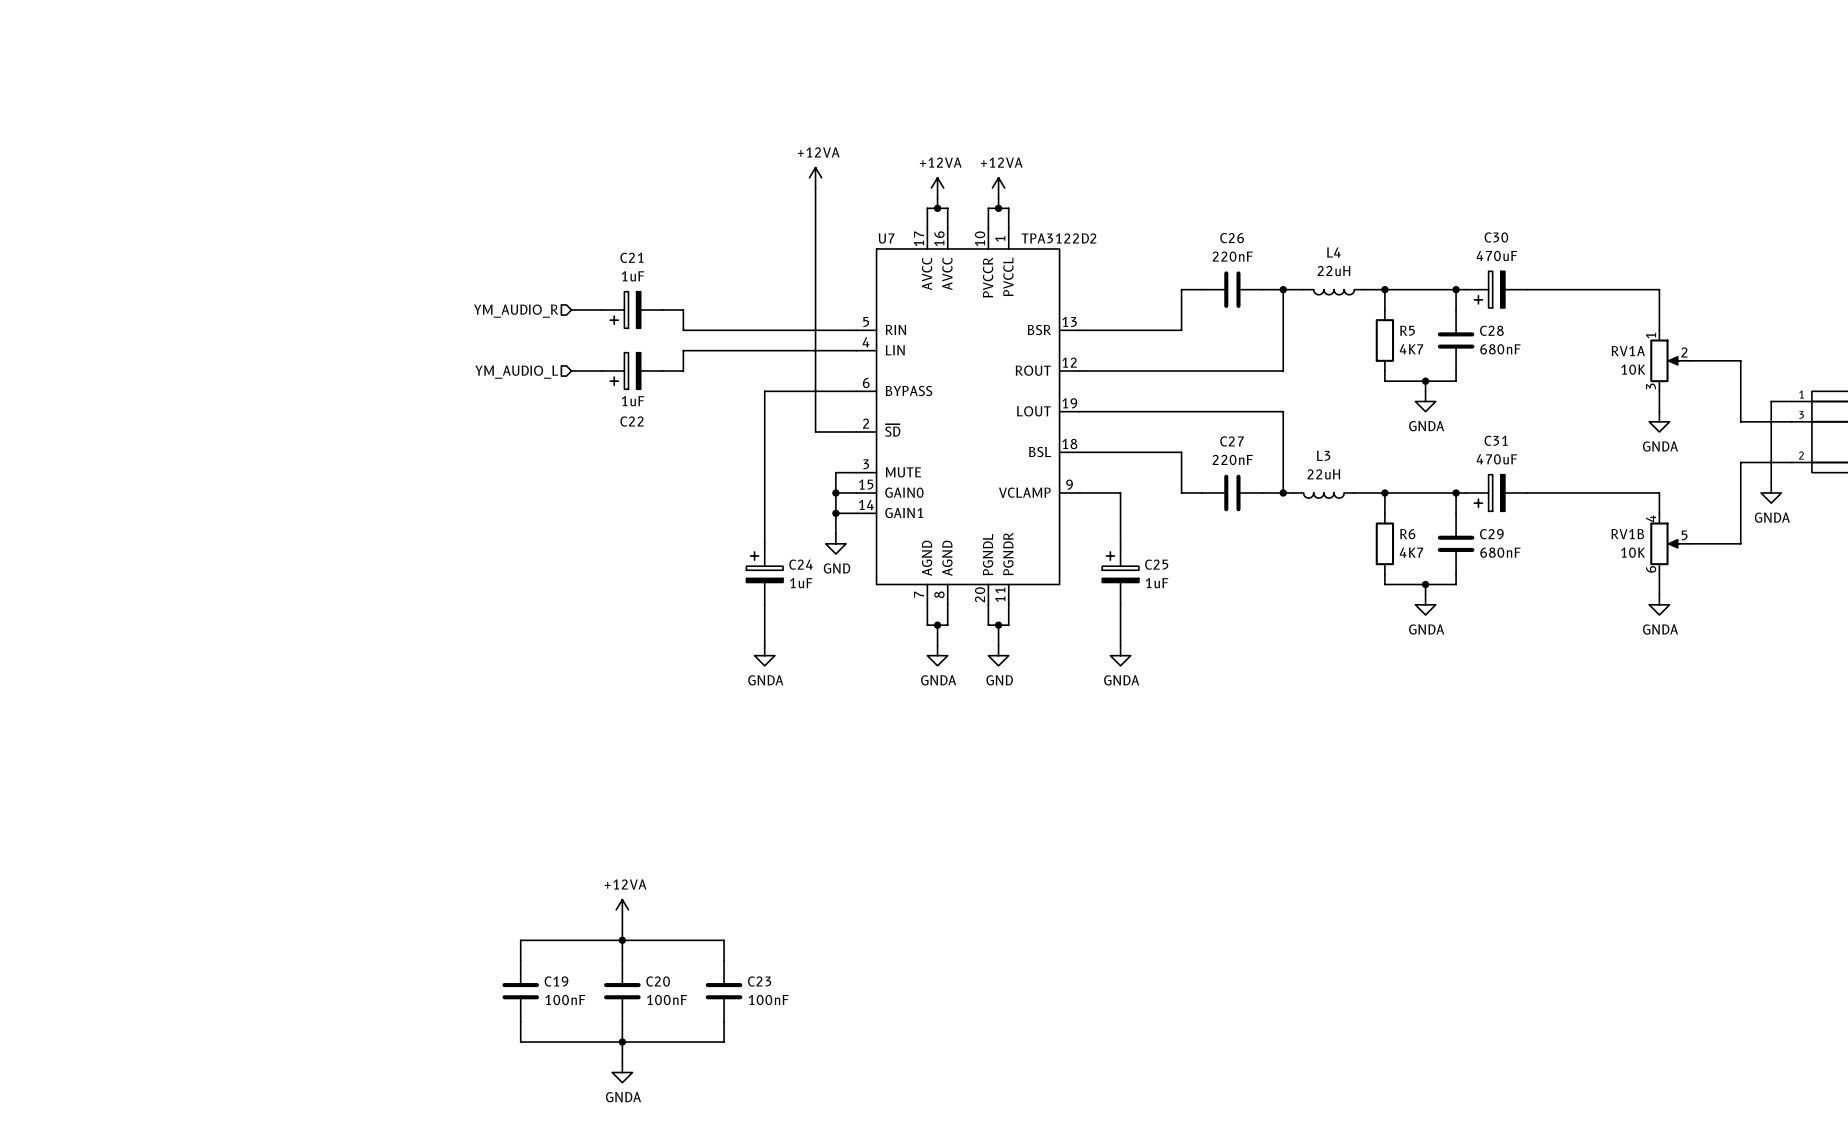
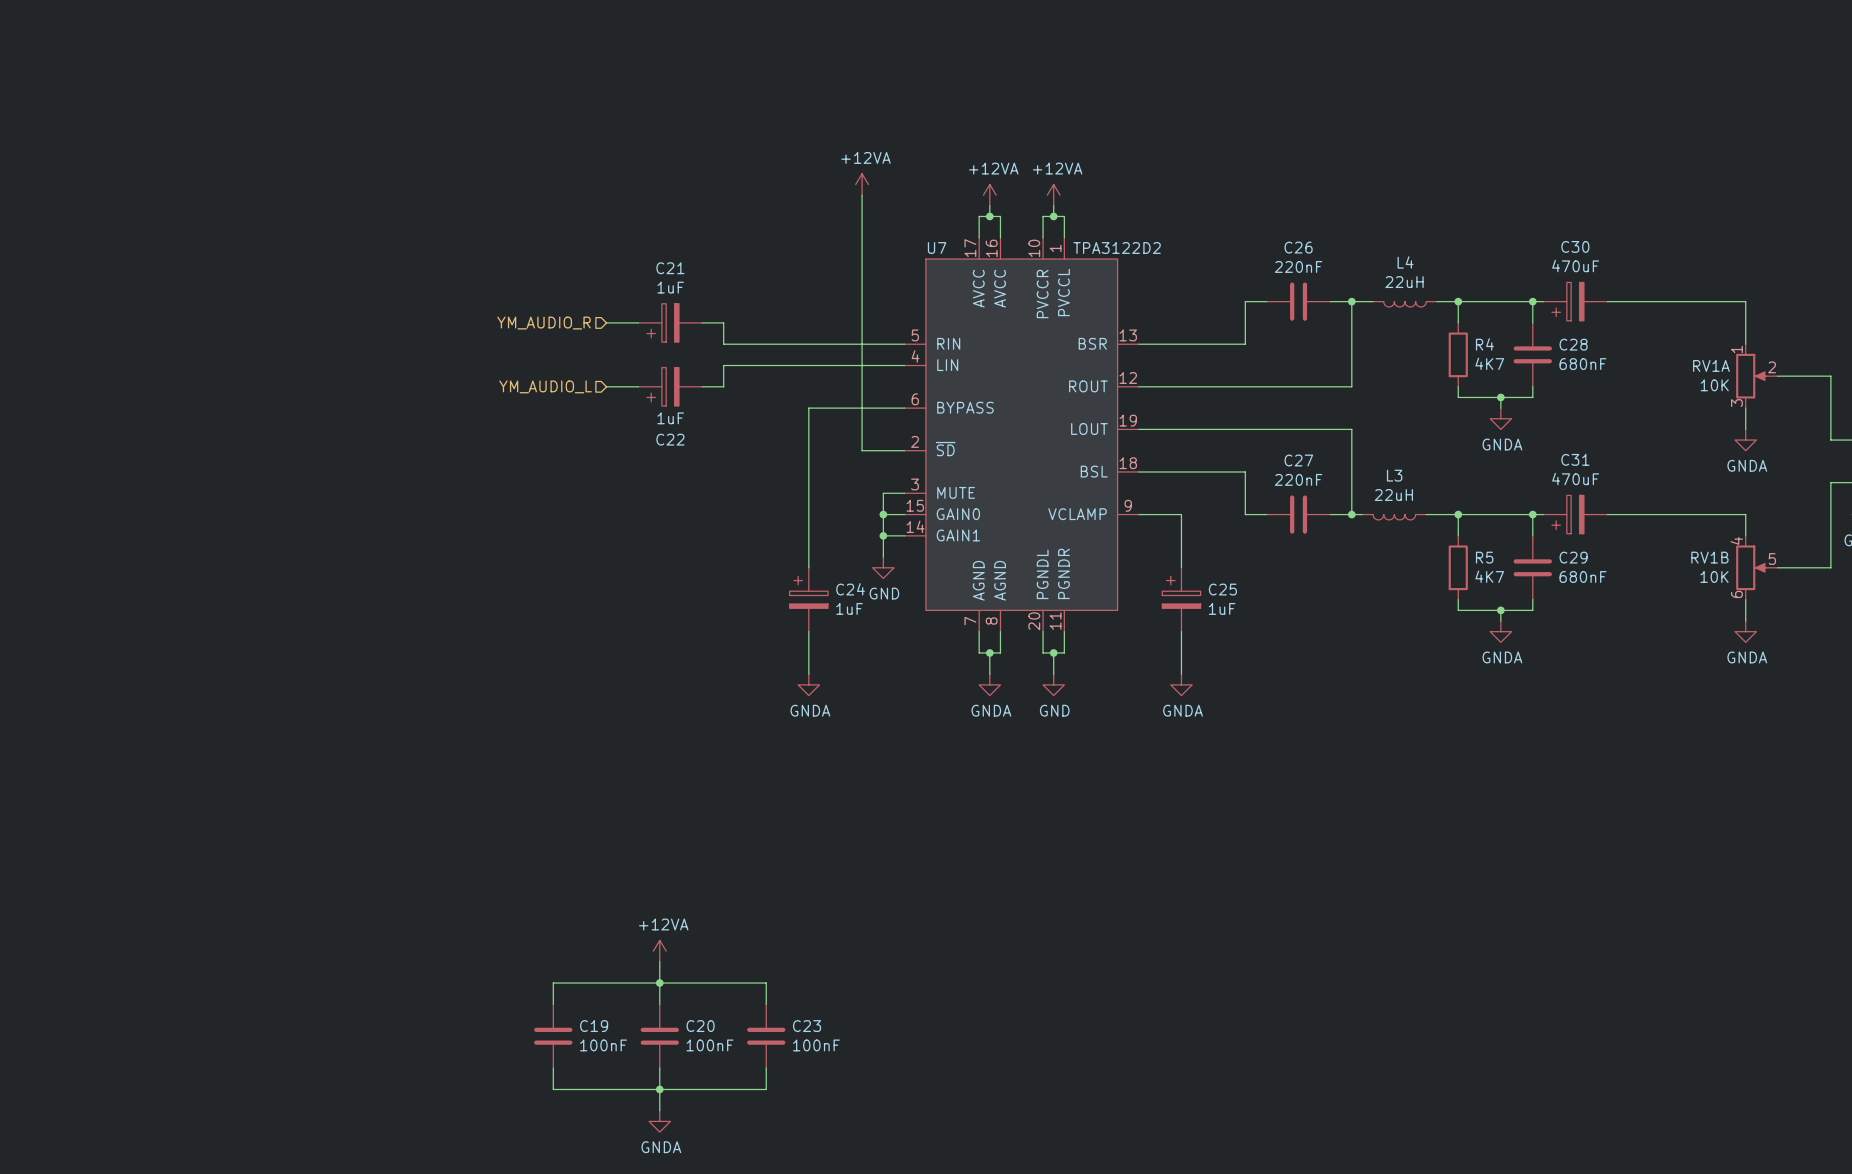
R5 name: R5 (1407, 330) -> R4 (1484, 344)
R6 name: R6 (1407, 534) -> R5 (1484, 557)

